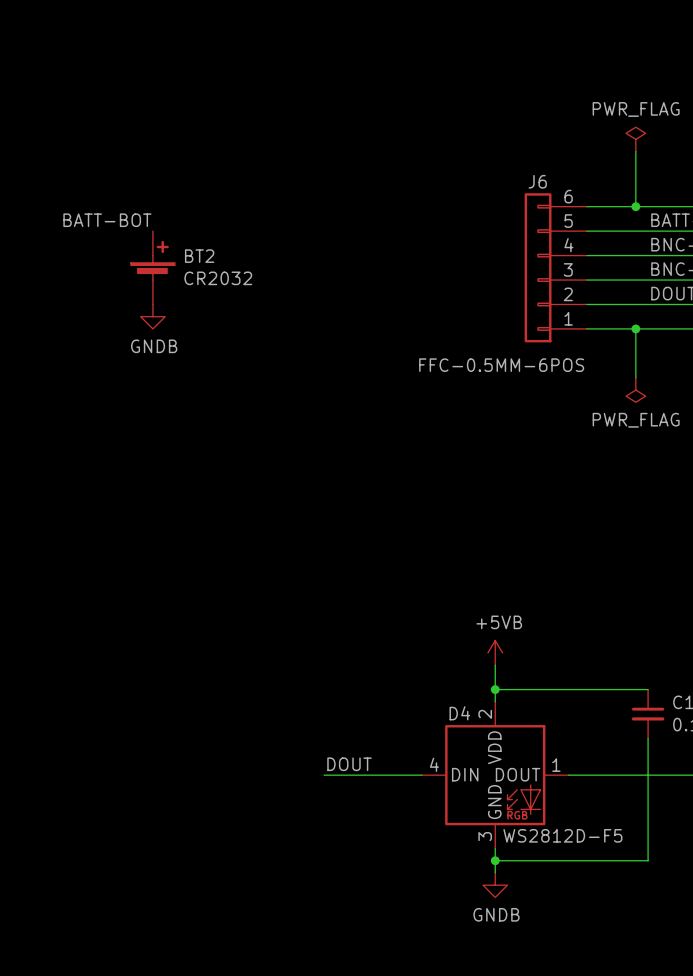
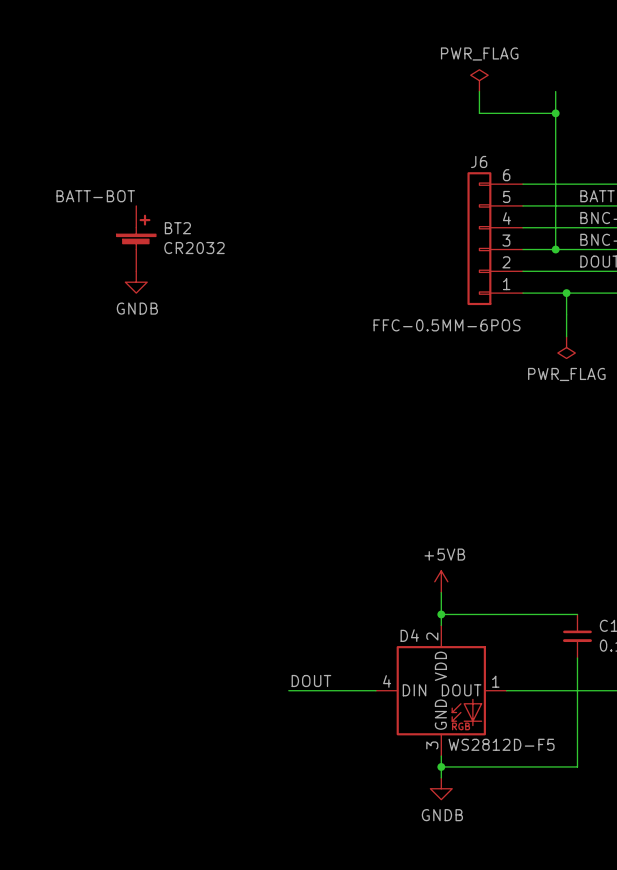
wire: none -> (479, 91) (479, 113) (555, 113)
wire: none -> (555, 91) (555, 249)
junction: none -> (555, 113)
power symbol position: PWR_FLAG (635, 139) -> PWR_FLAG (479, 80)
wire: (635, 151) (635, 206) -> none
junction: (635, 206) -> none
junction: none -> (555, 249)

